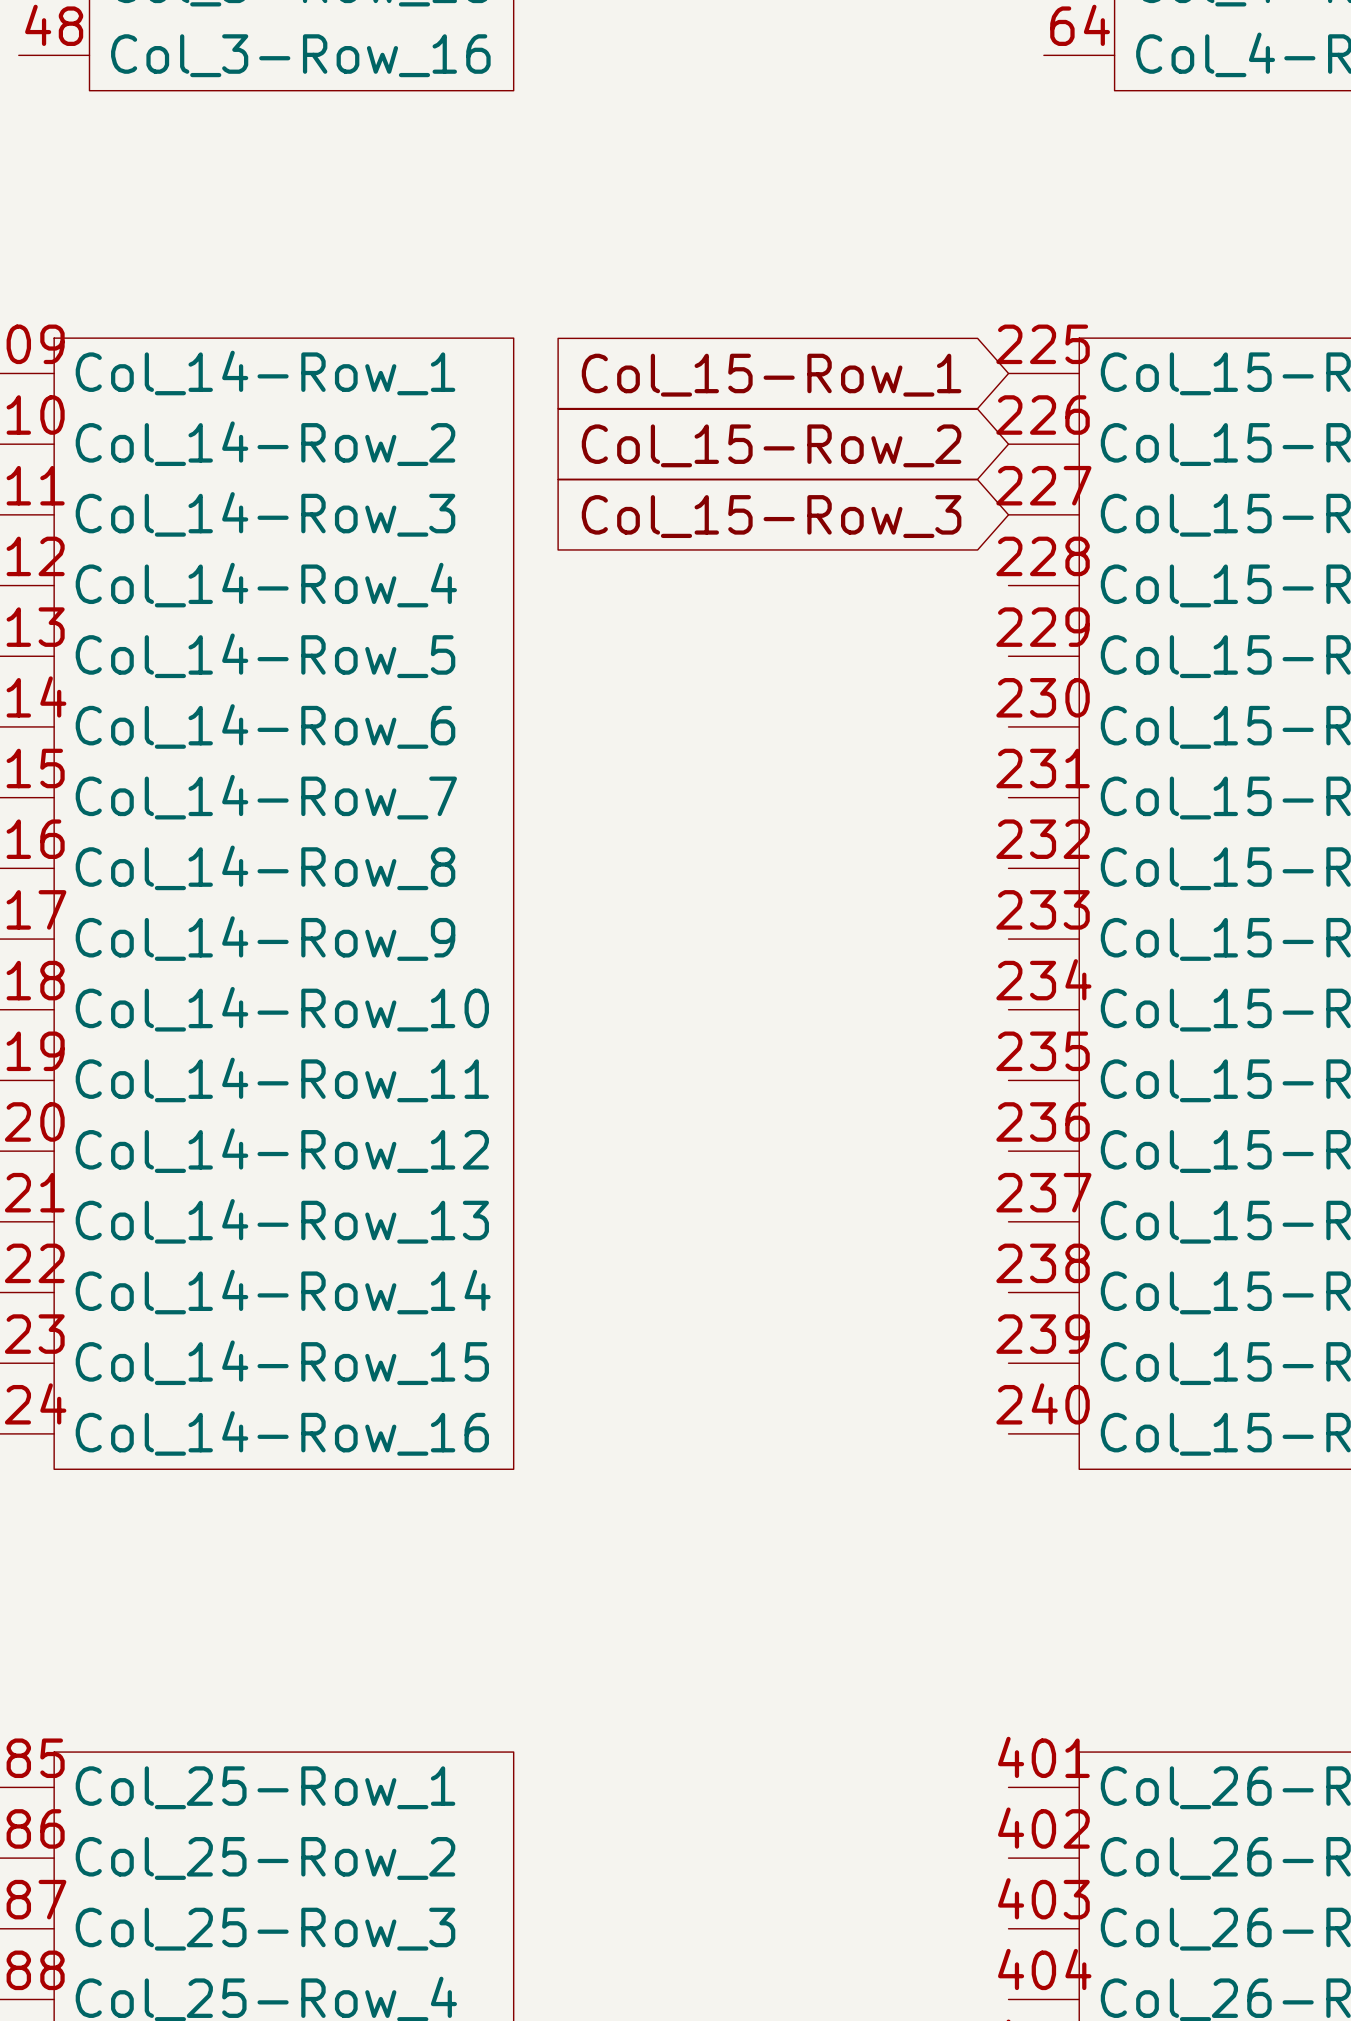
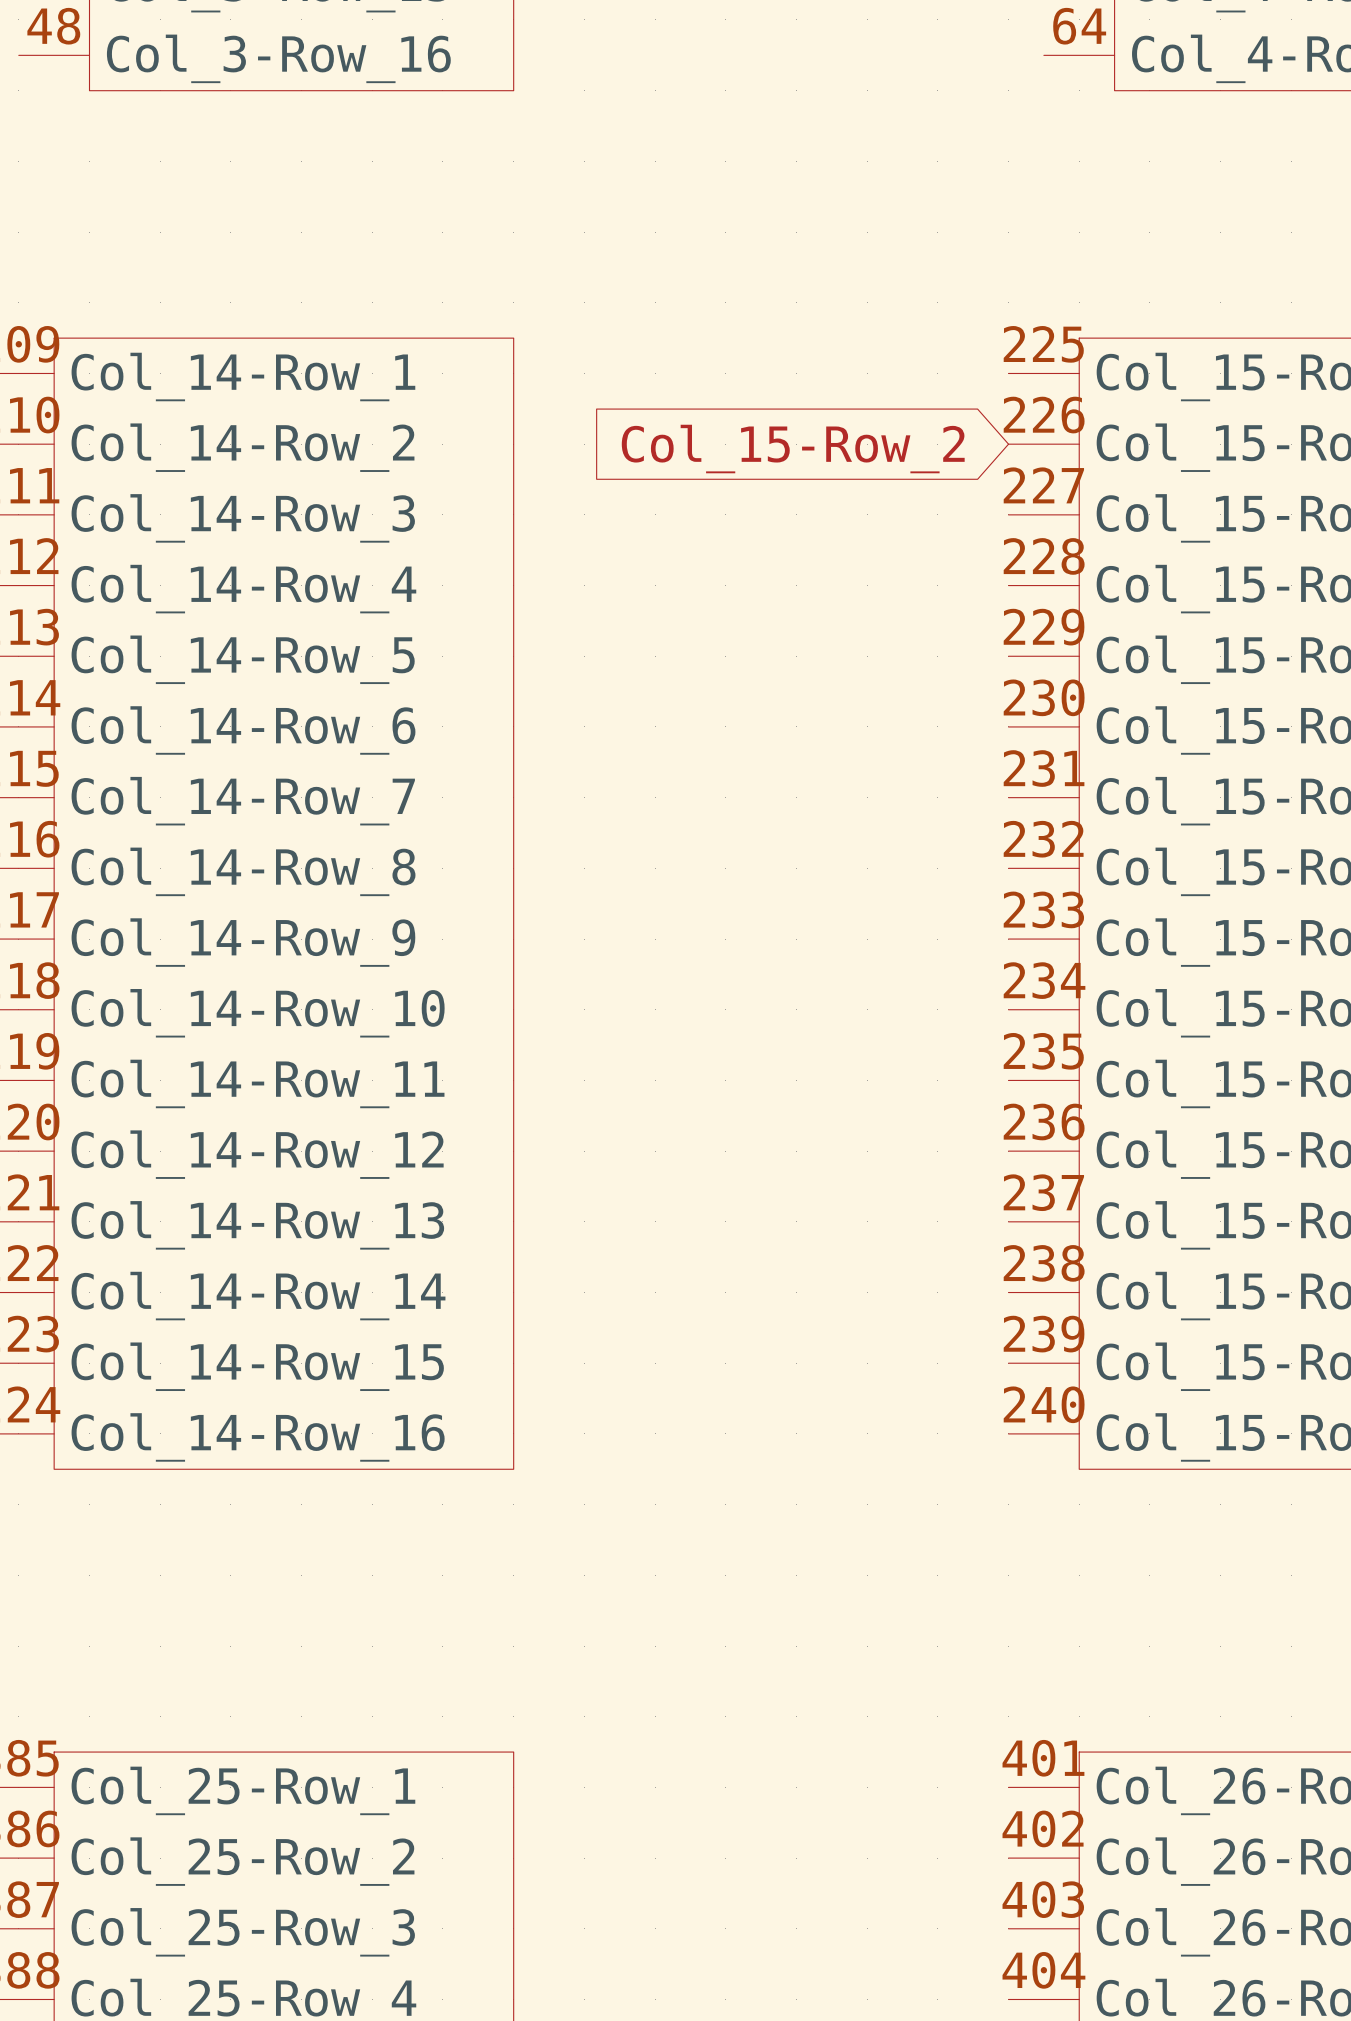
global label: Col_15-Row_1 (771, 375) -> none
global label: Col_15-Row_3 (771, 516) -> none

